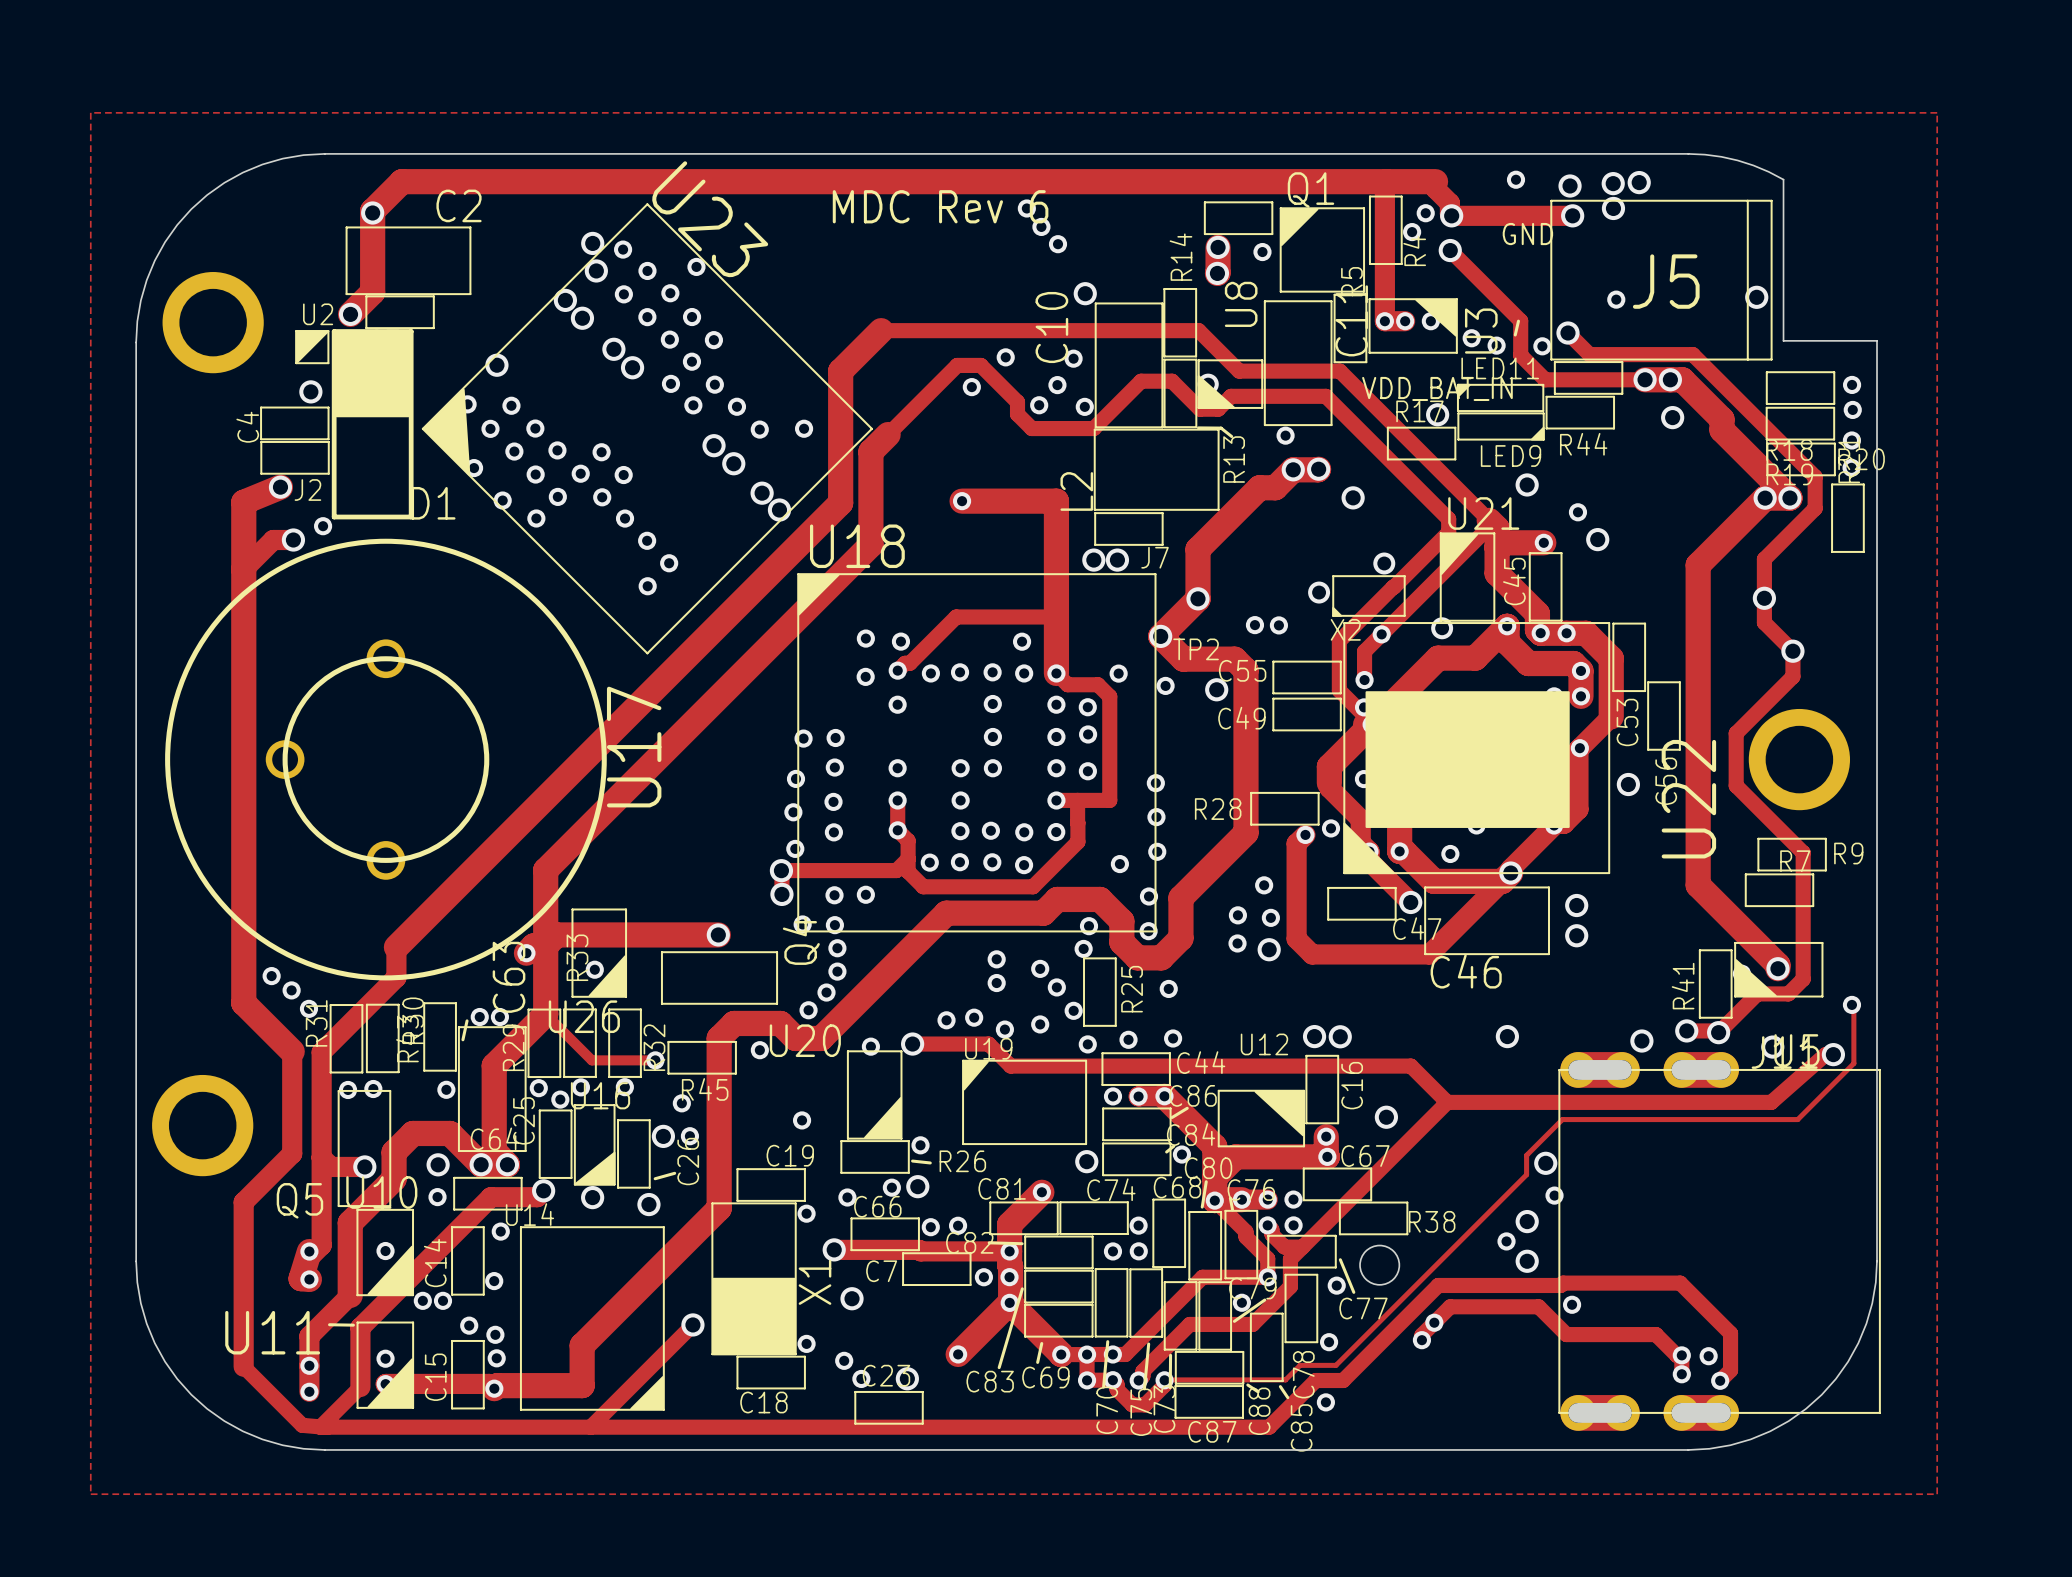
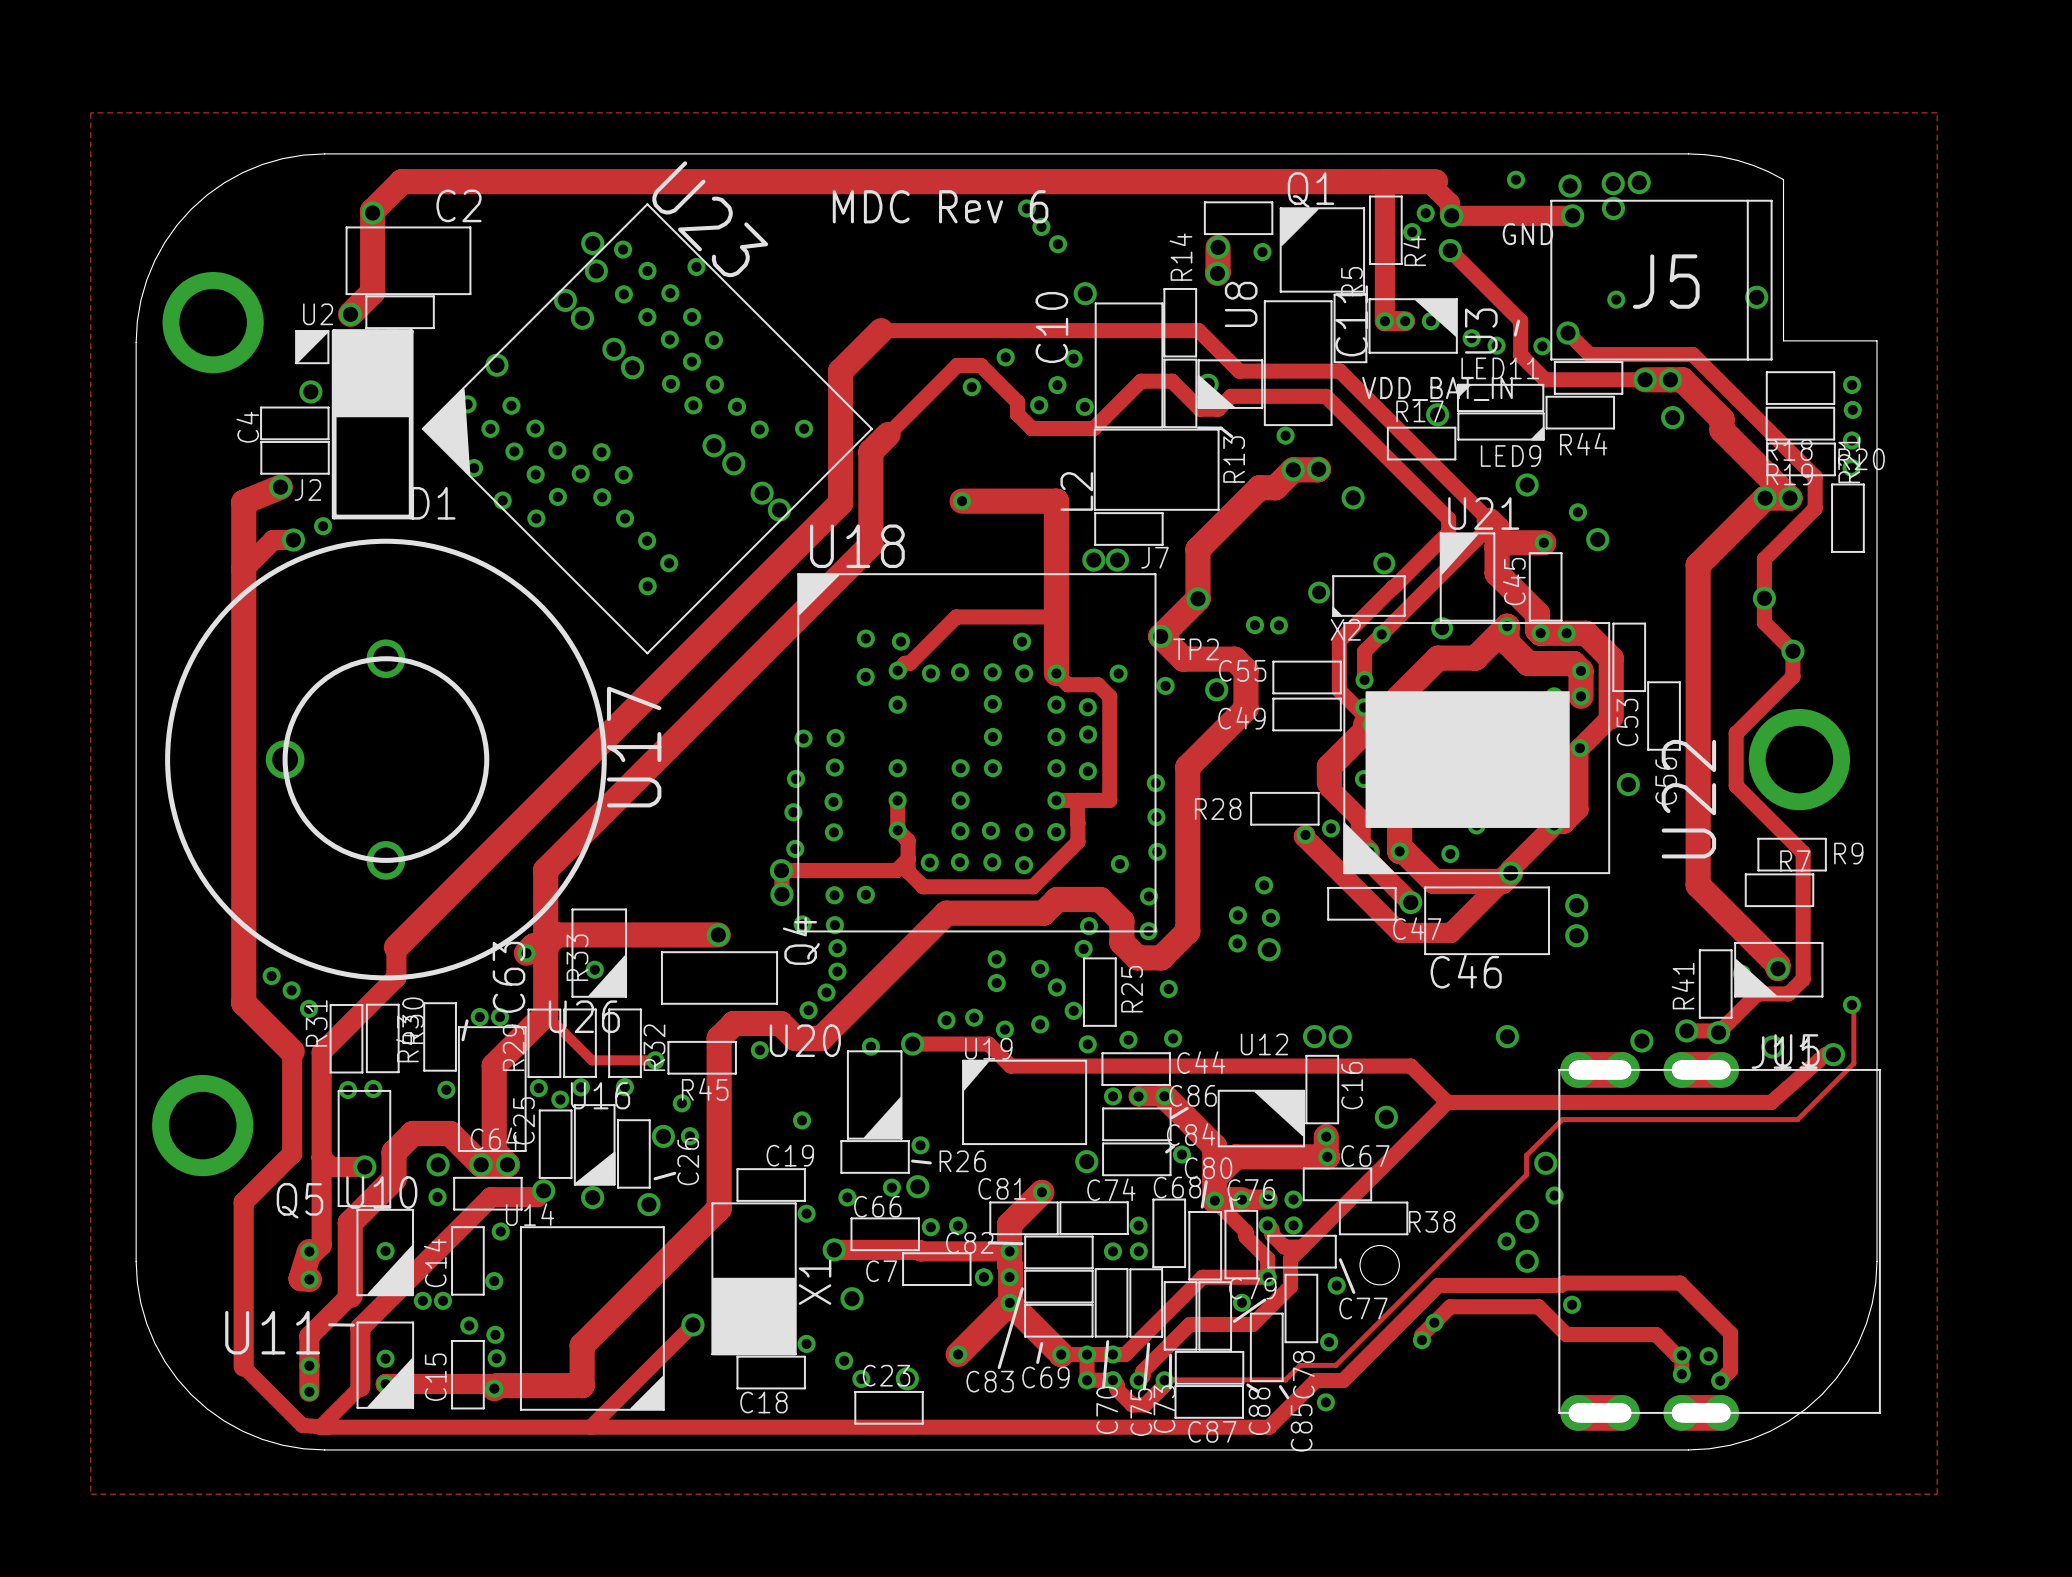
track: (1245, 708) (1245, 832) (1180, 897) (1180, 938) -> (1245, 708) (1187, 767) (1187, 931) (1180, 938)
track: (1303, 836) (1296, 843) (1296, 938) (1312, 954) (1429, 954) (1450, 932) -> (1303, 836) (1400, 932) (1450, 932)

